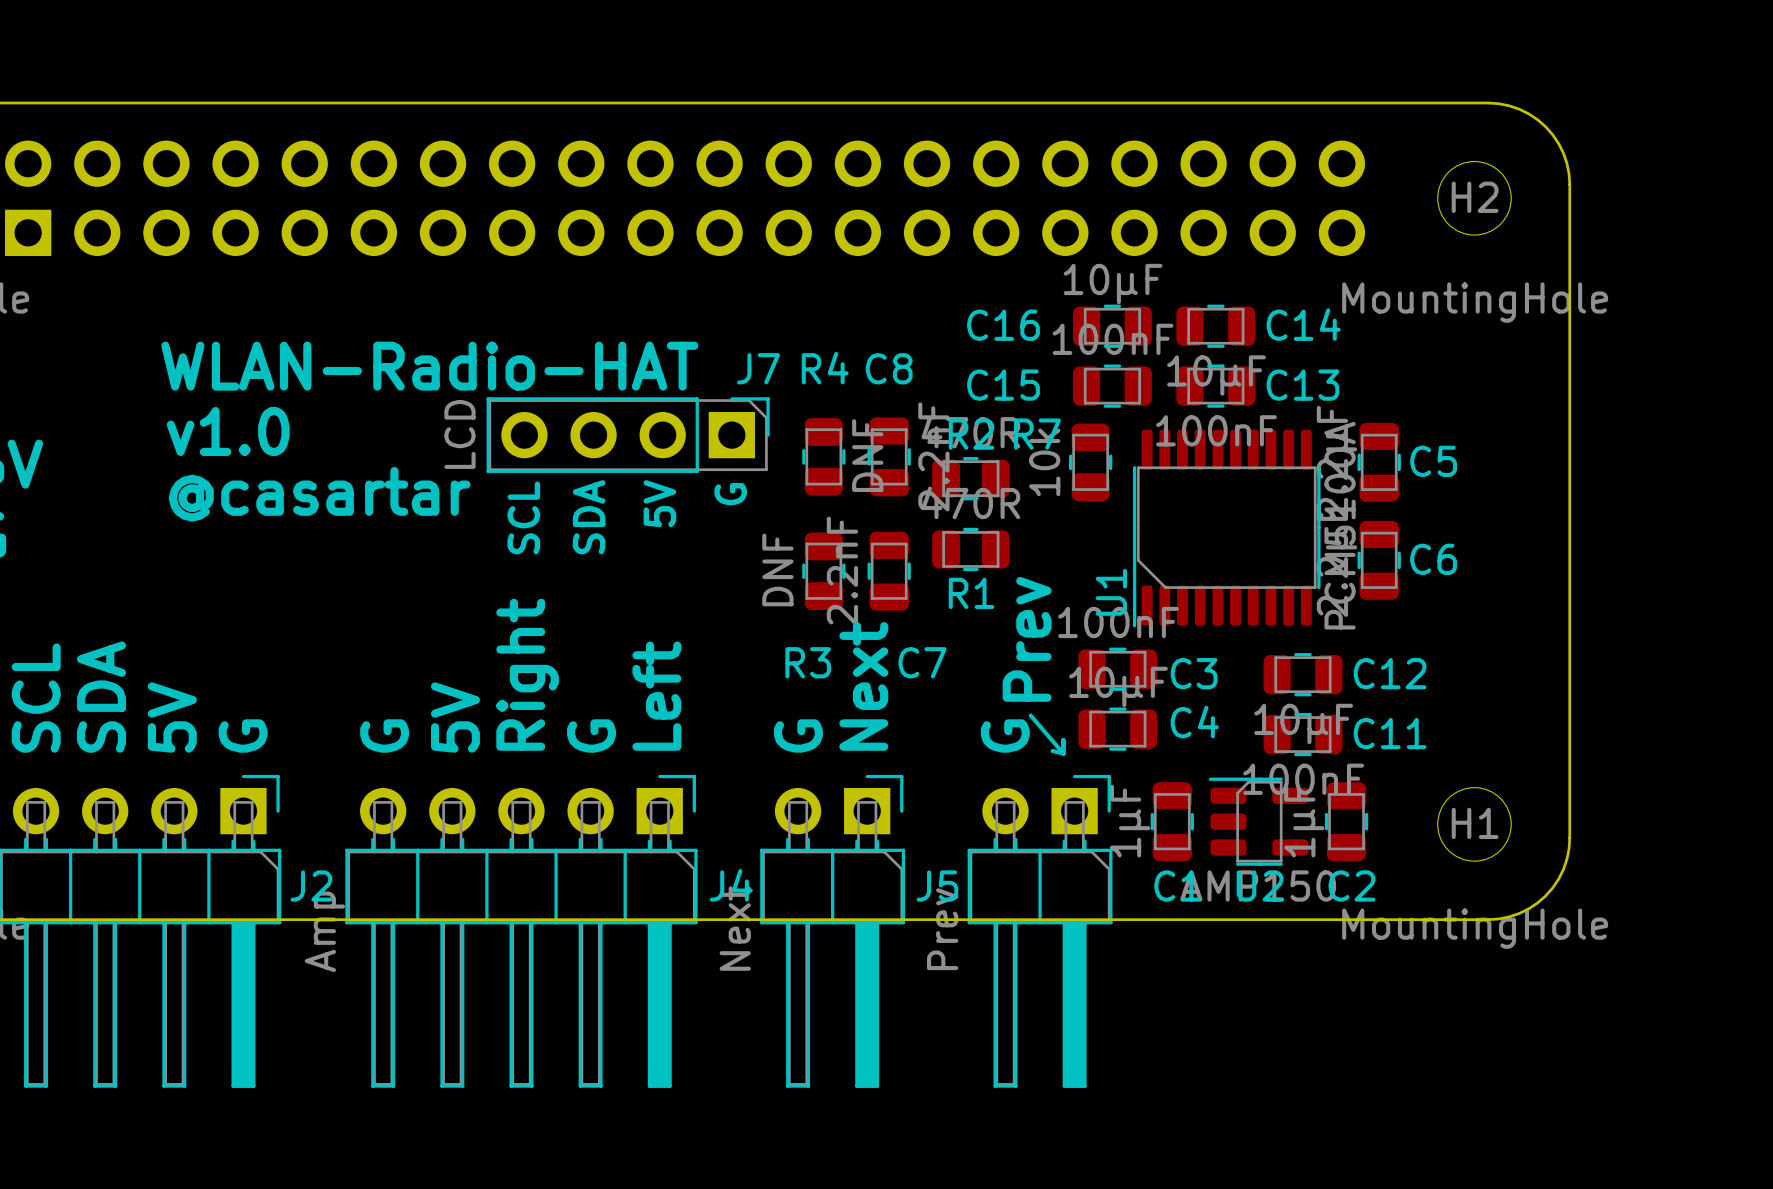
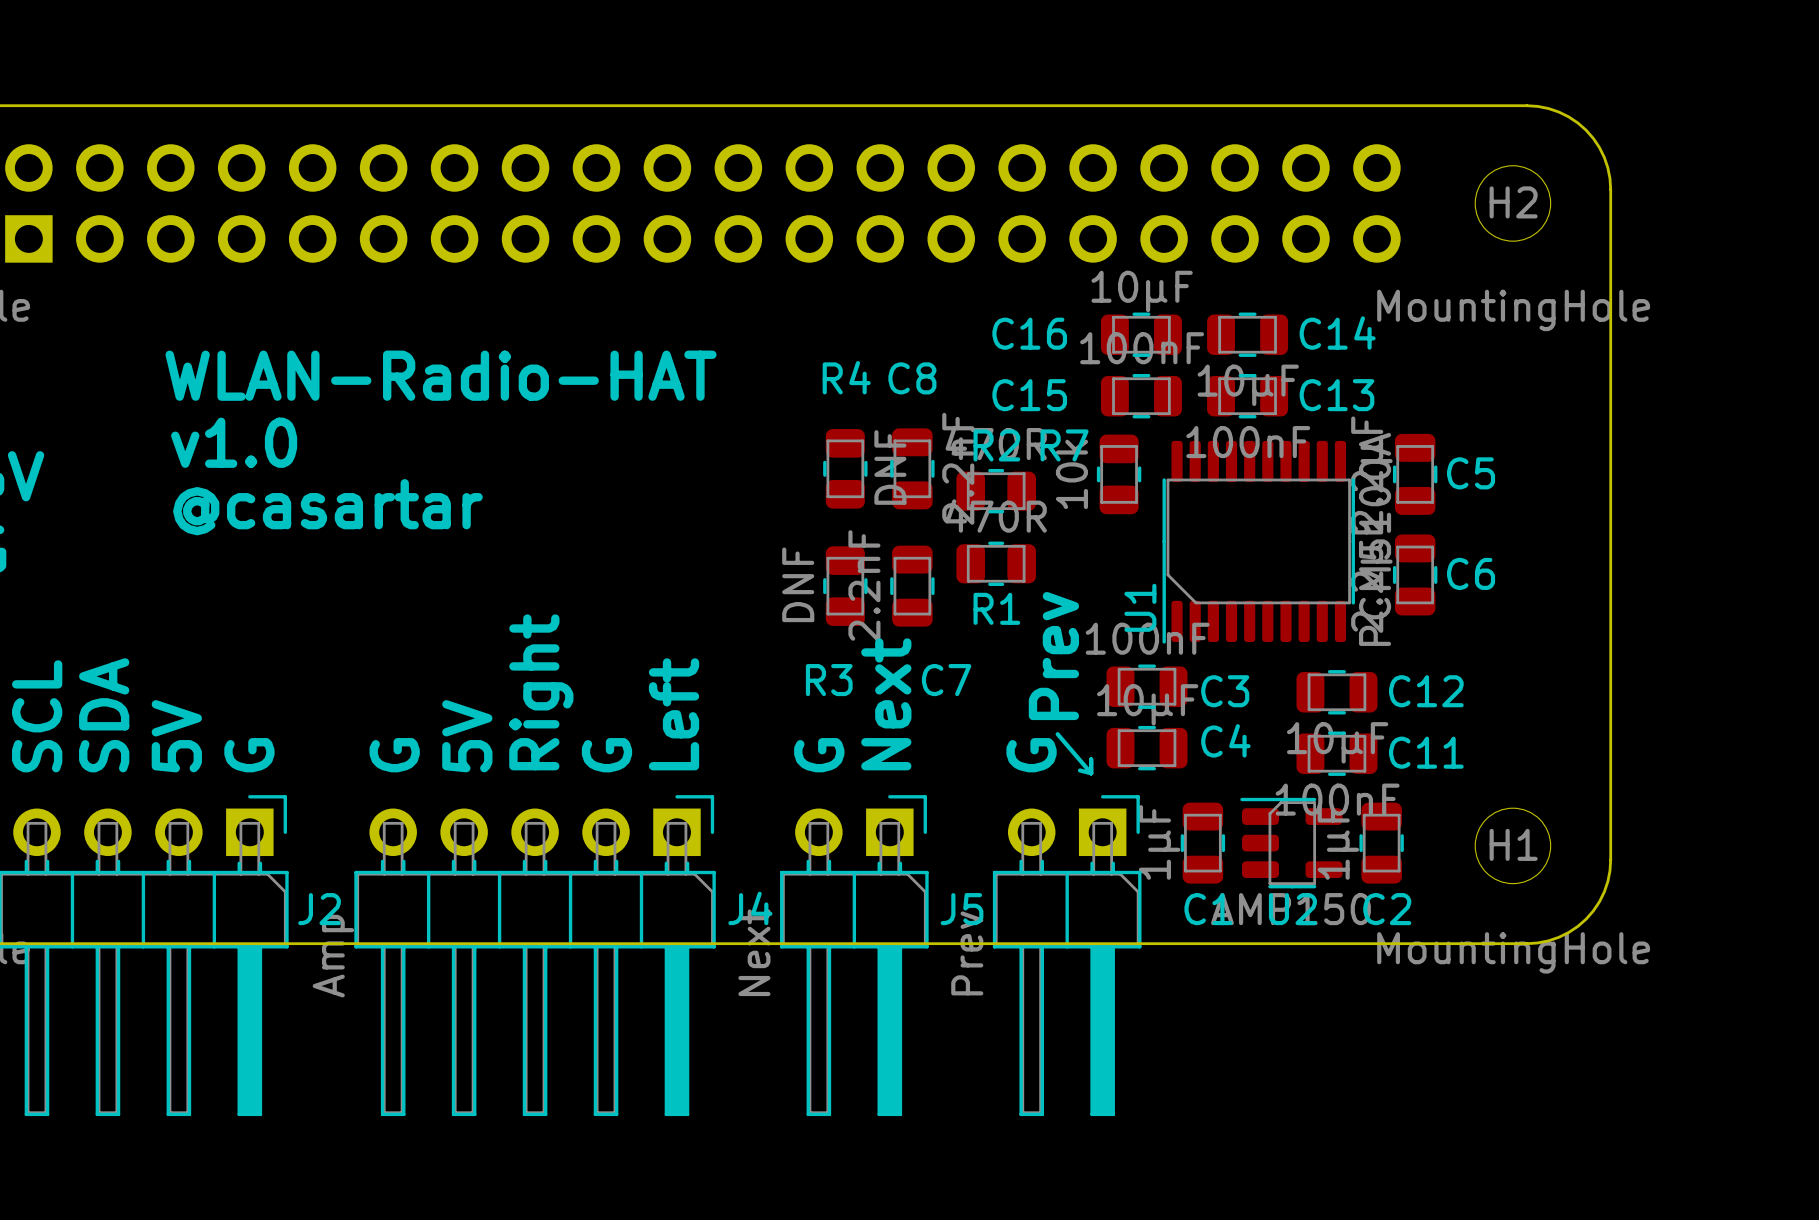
J7: LCD (628, 435) -> none
text: G (730, 494) -> none
text: 5V (659, 503) -> none
text: SCL (523, 517) -> none
text: SDA (589, 517) -> none

